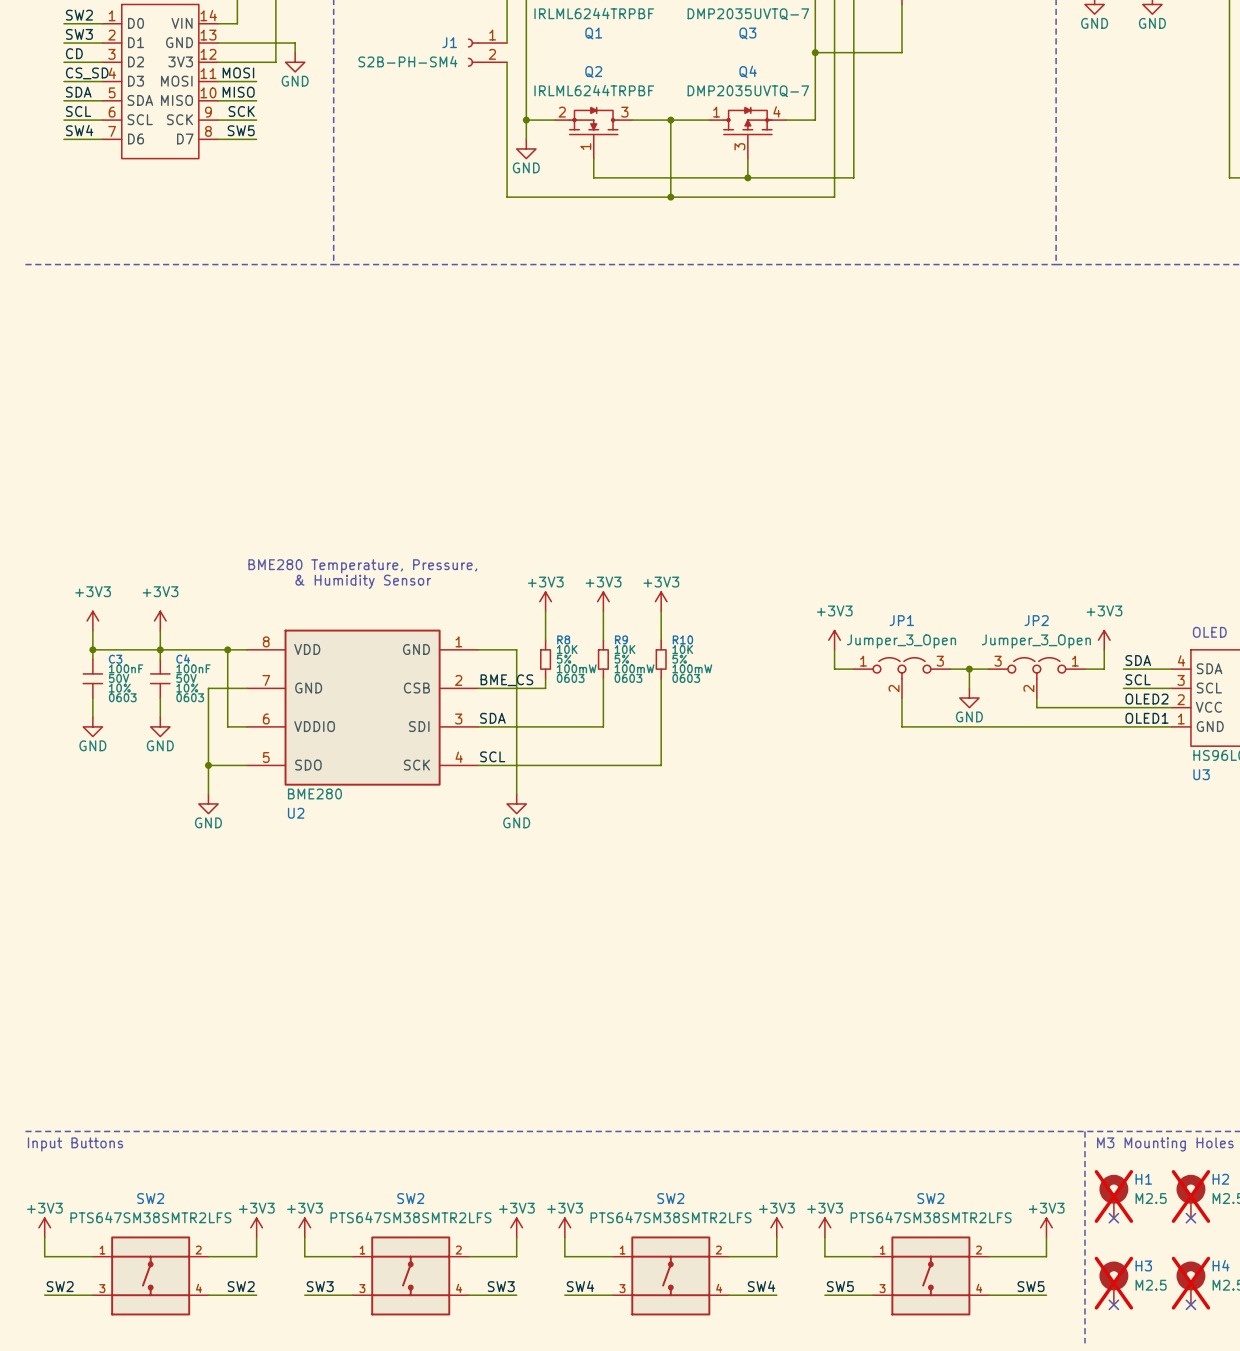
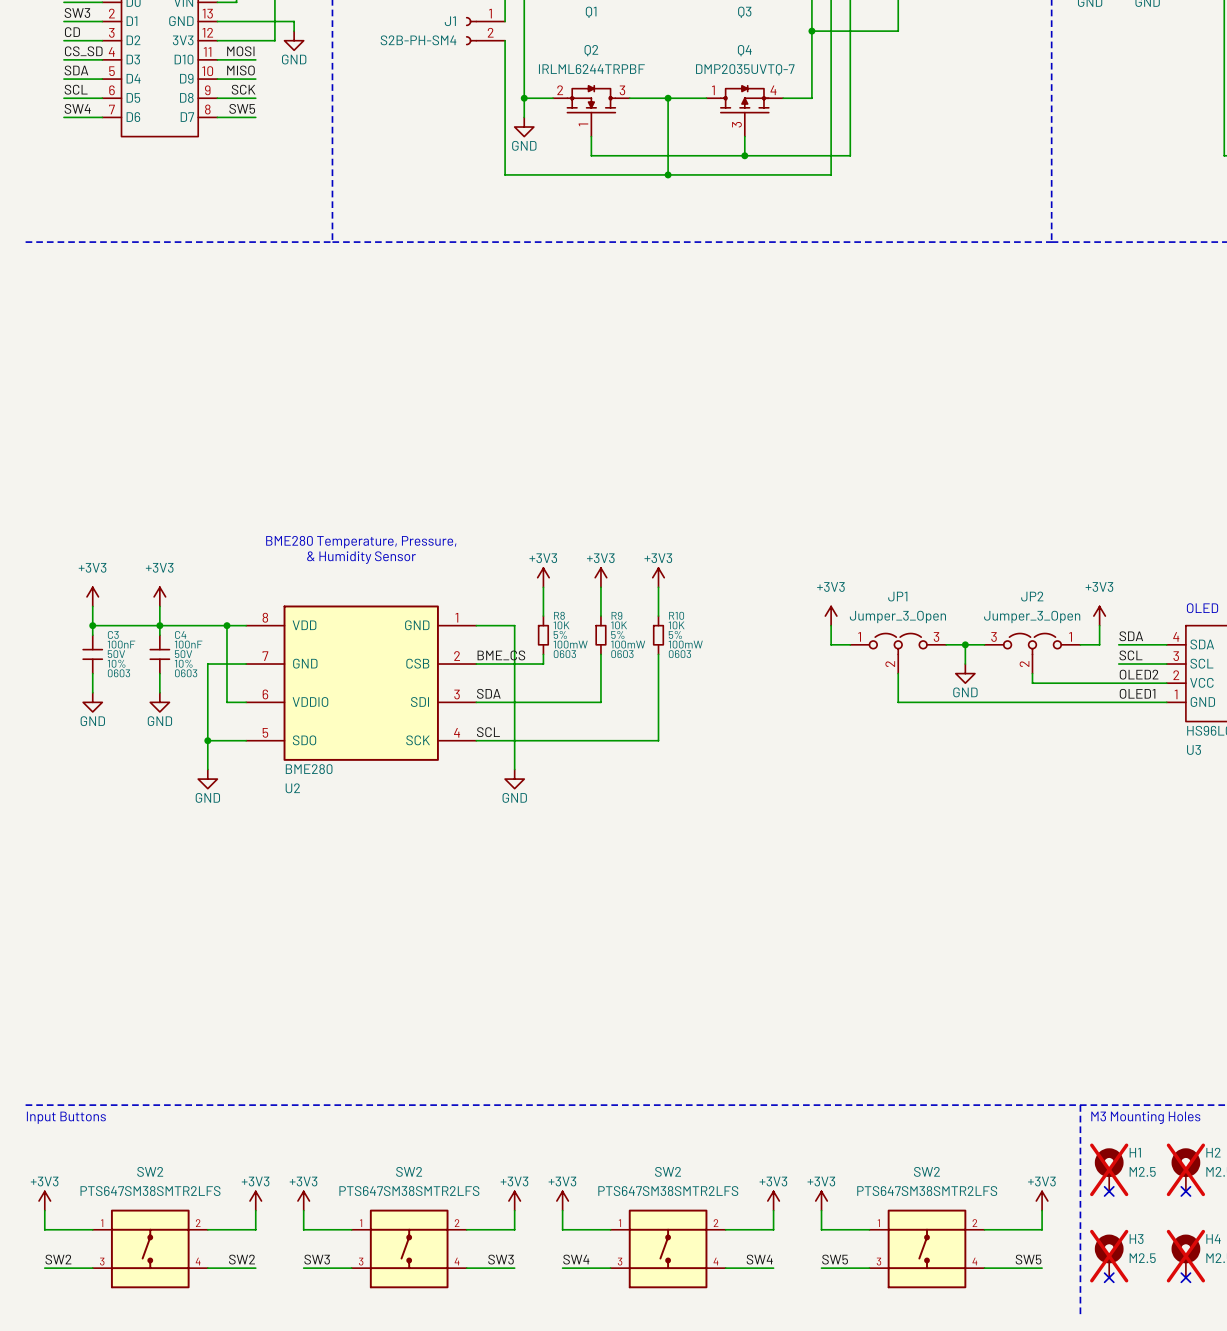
part pin name: MOSI (176, 81) -> D10 (184, 59)
part pin name: SDA (140, 100) -> D4 (133, 78)
part pin name: MISO (177, 100) -> D9 (186, 78)
part pin name: SCL (140, 119) -> D5 (133, 97)
part pin name: SCK (180, 119) -> D8 (186, 97)

